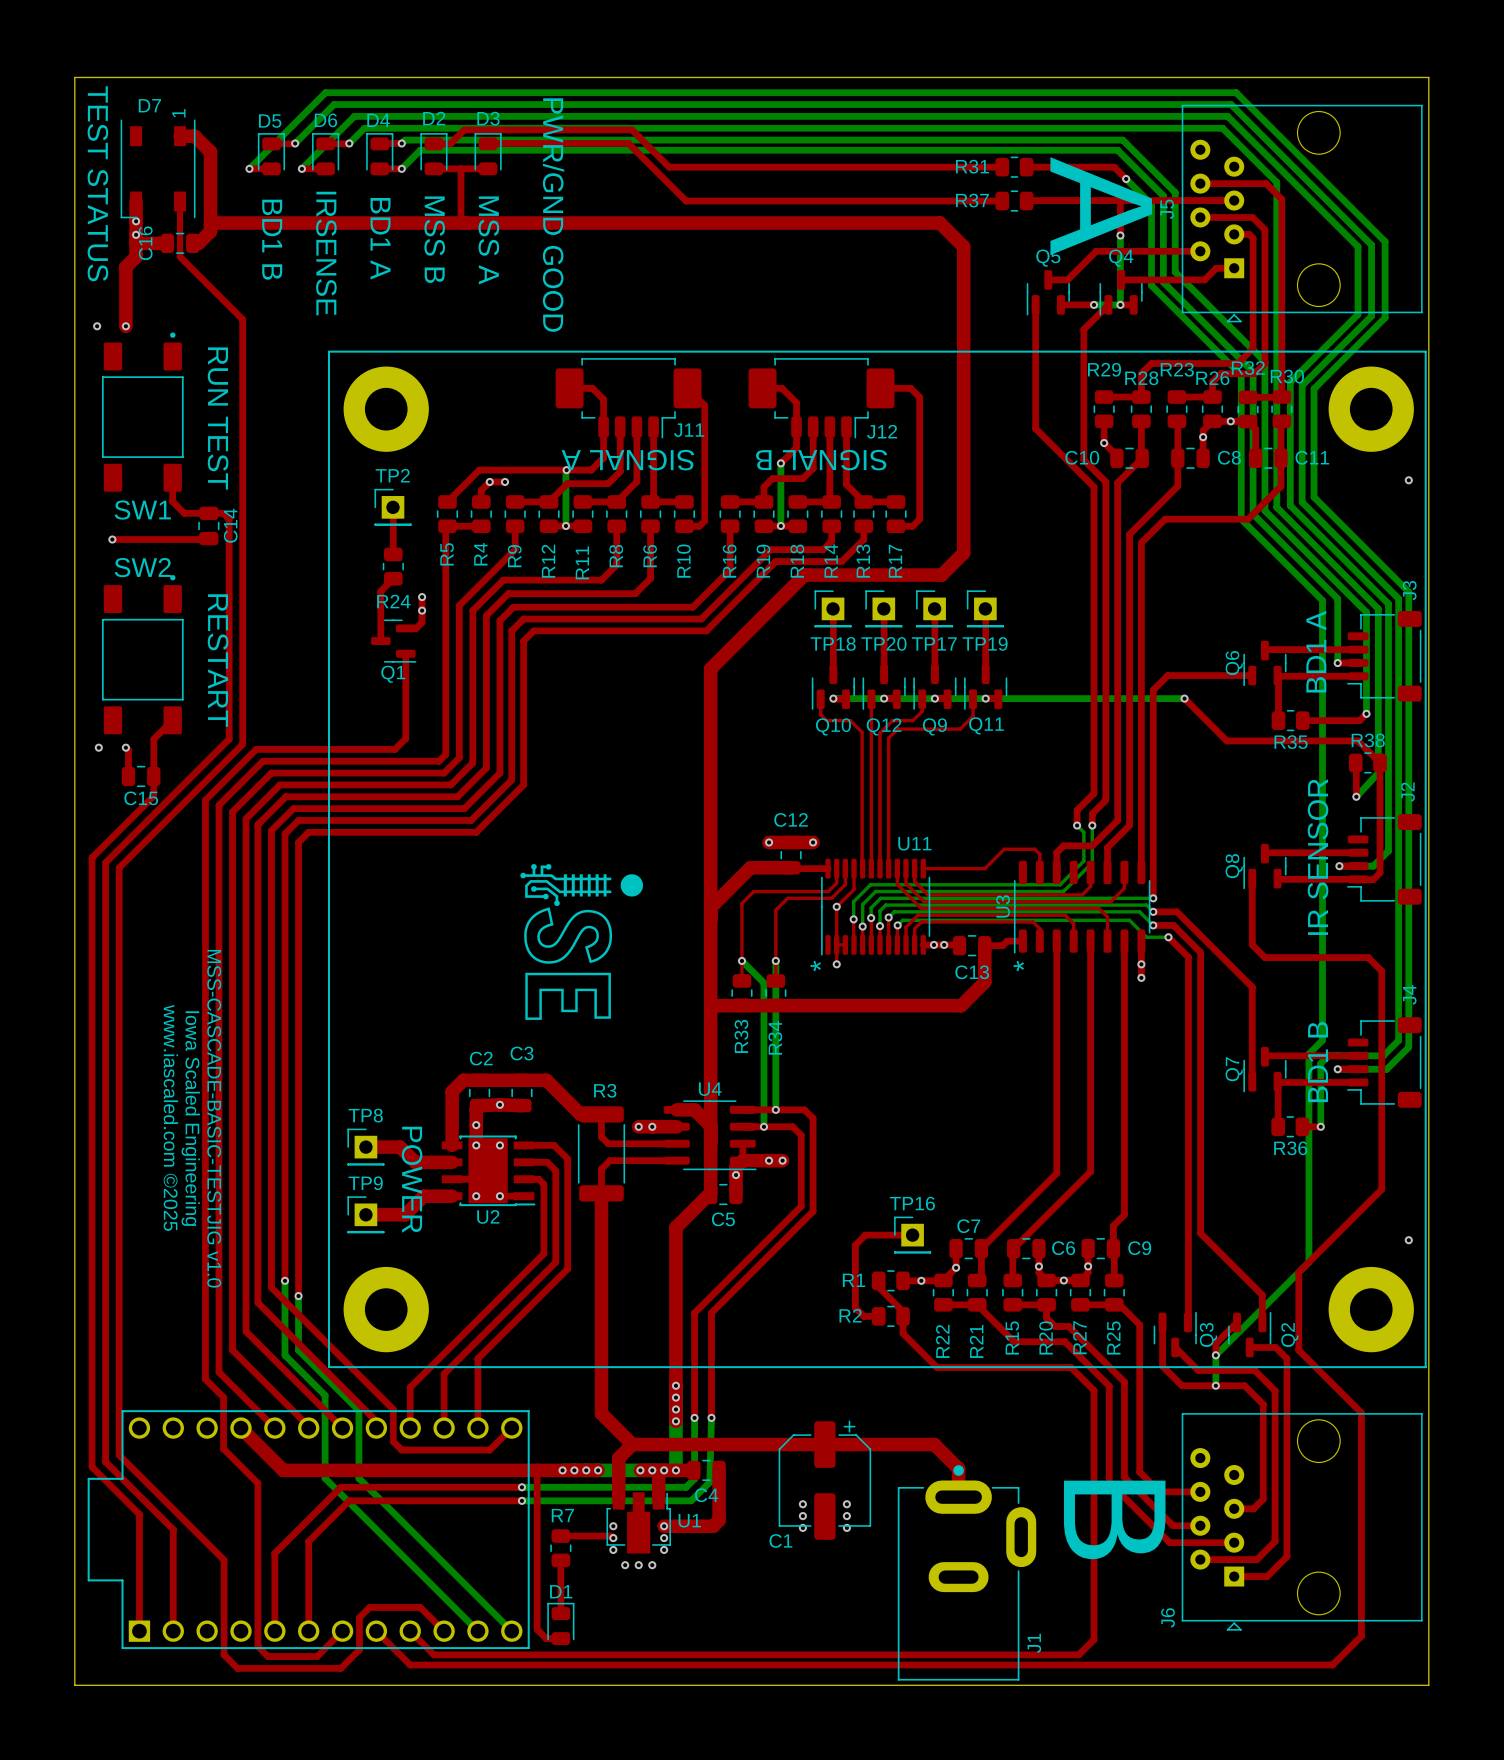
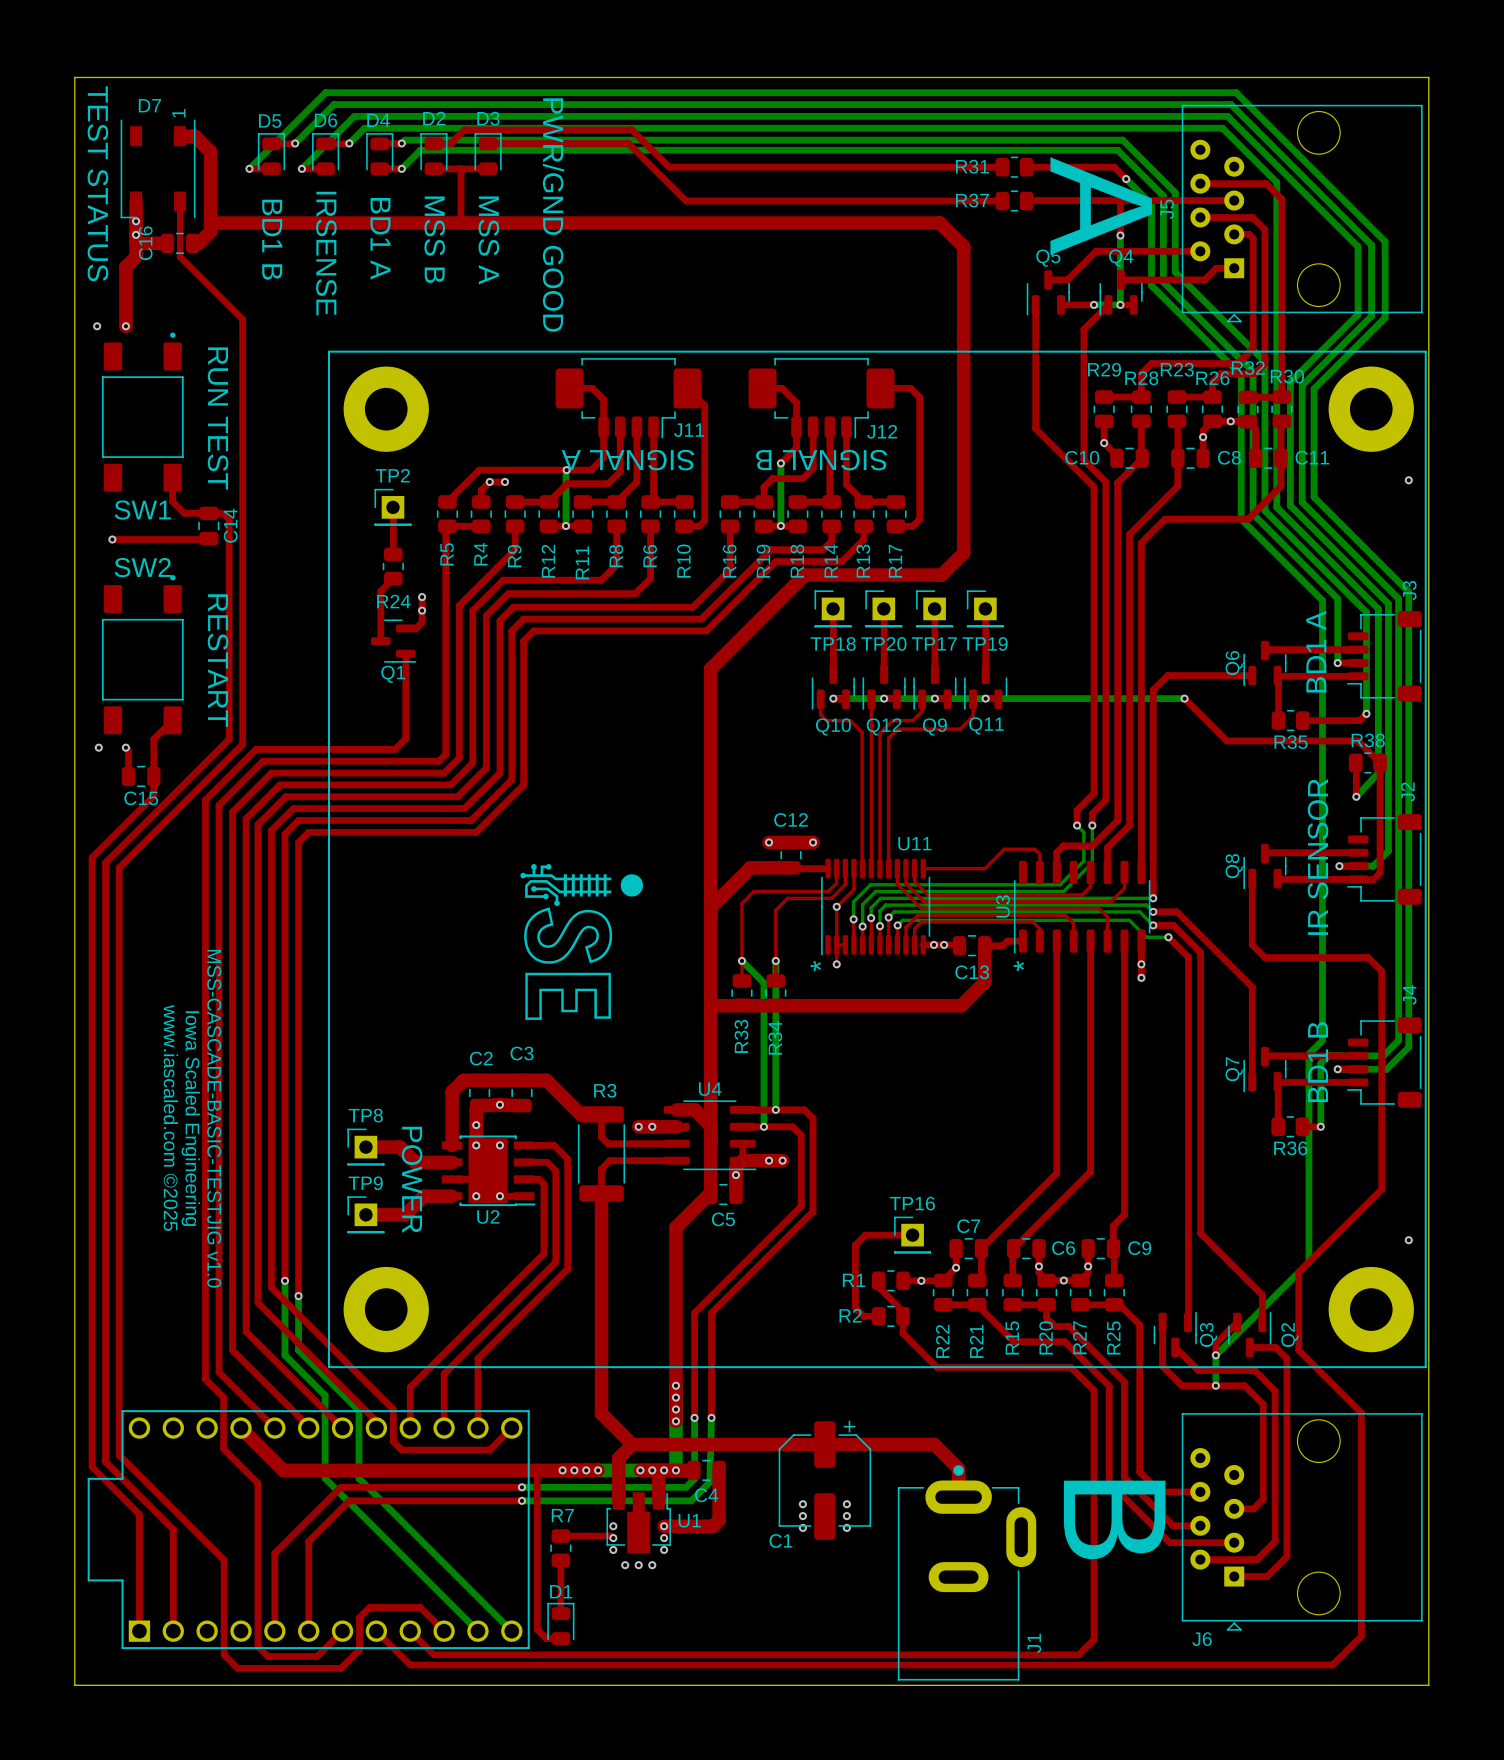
J6 name rotation: 0° (1167, 1617) -> 90° clockwise (1202, 1639)
J6 name position: J6 (1167, 1617) -> J6 (1202, 1639)

